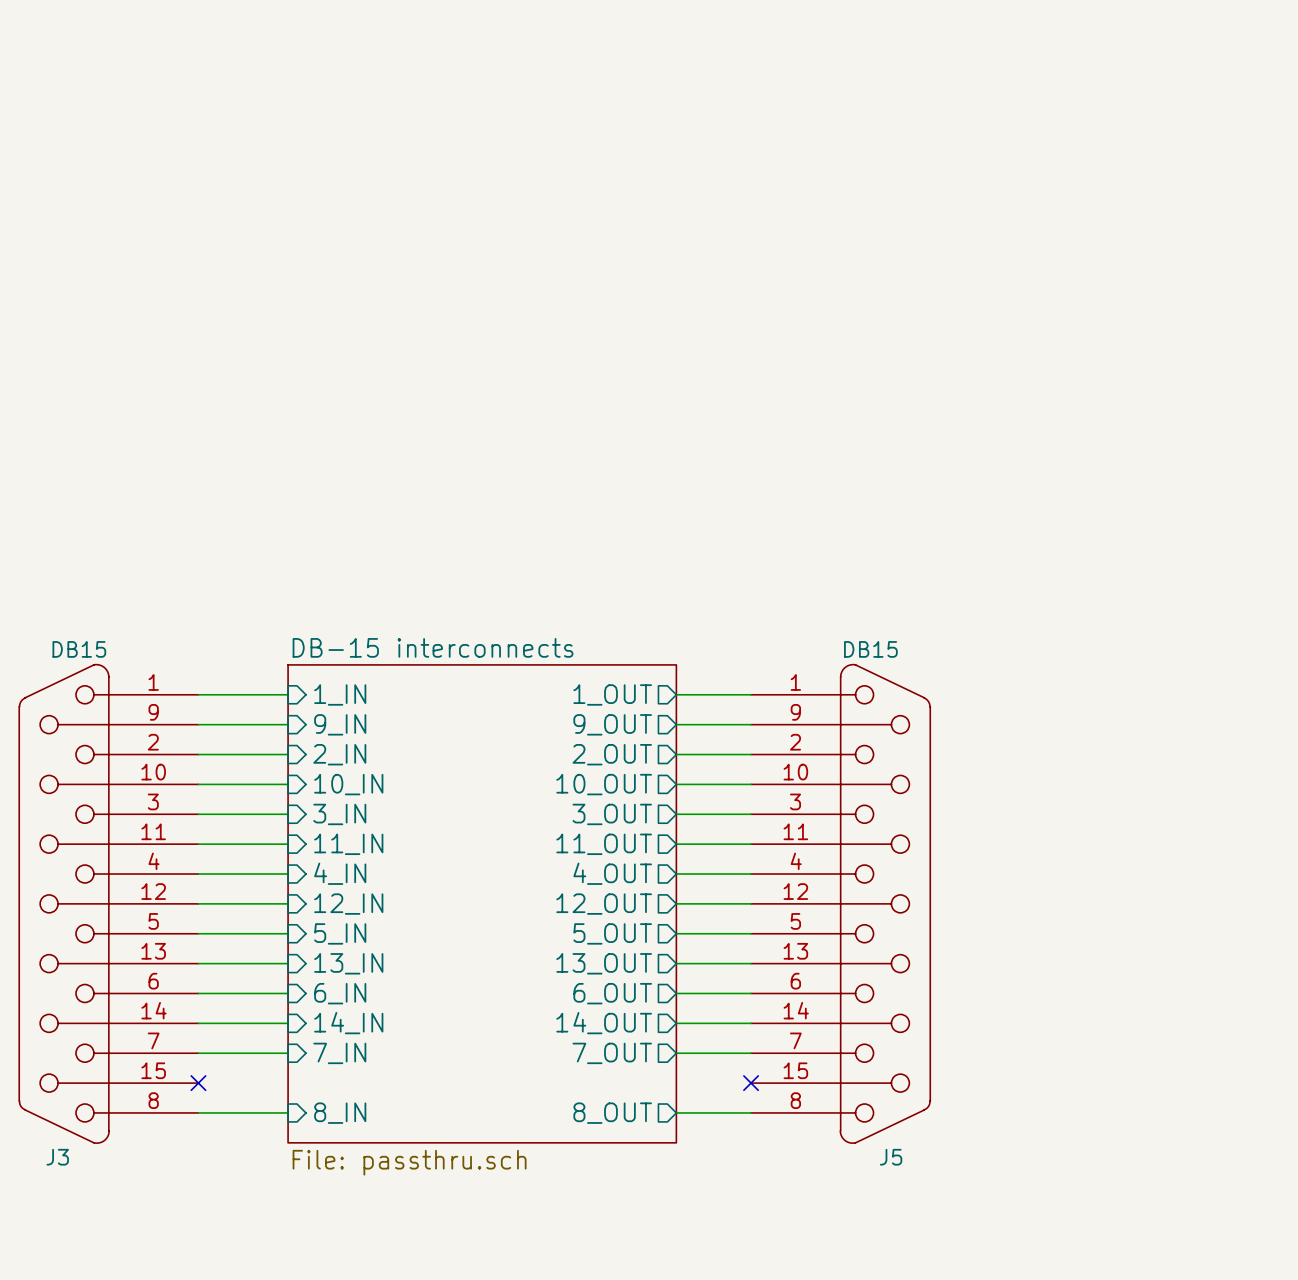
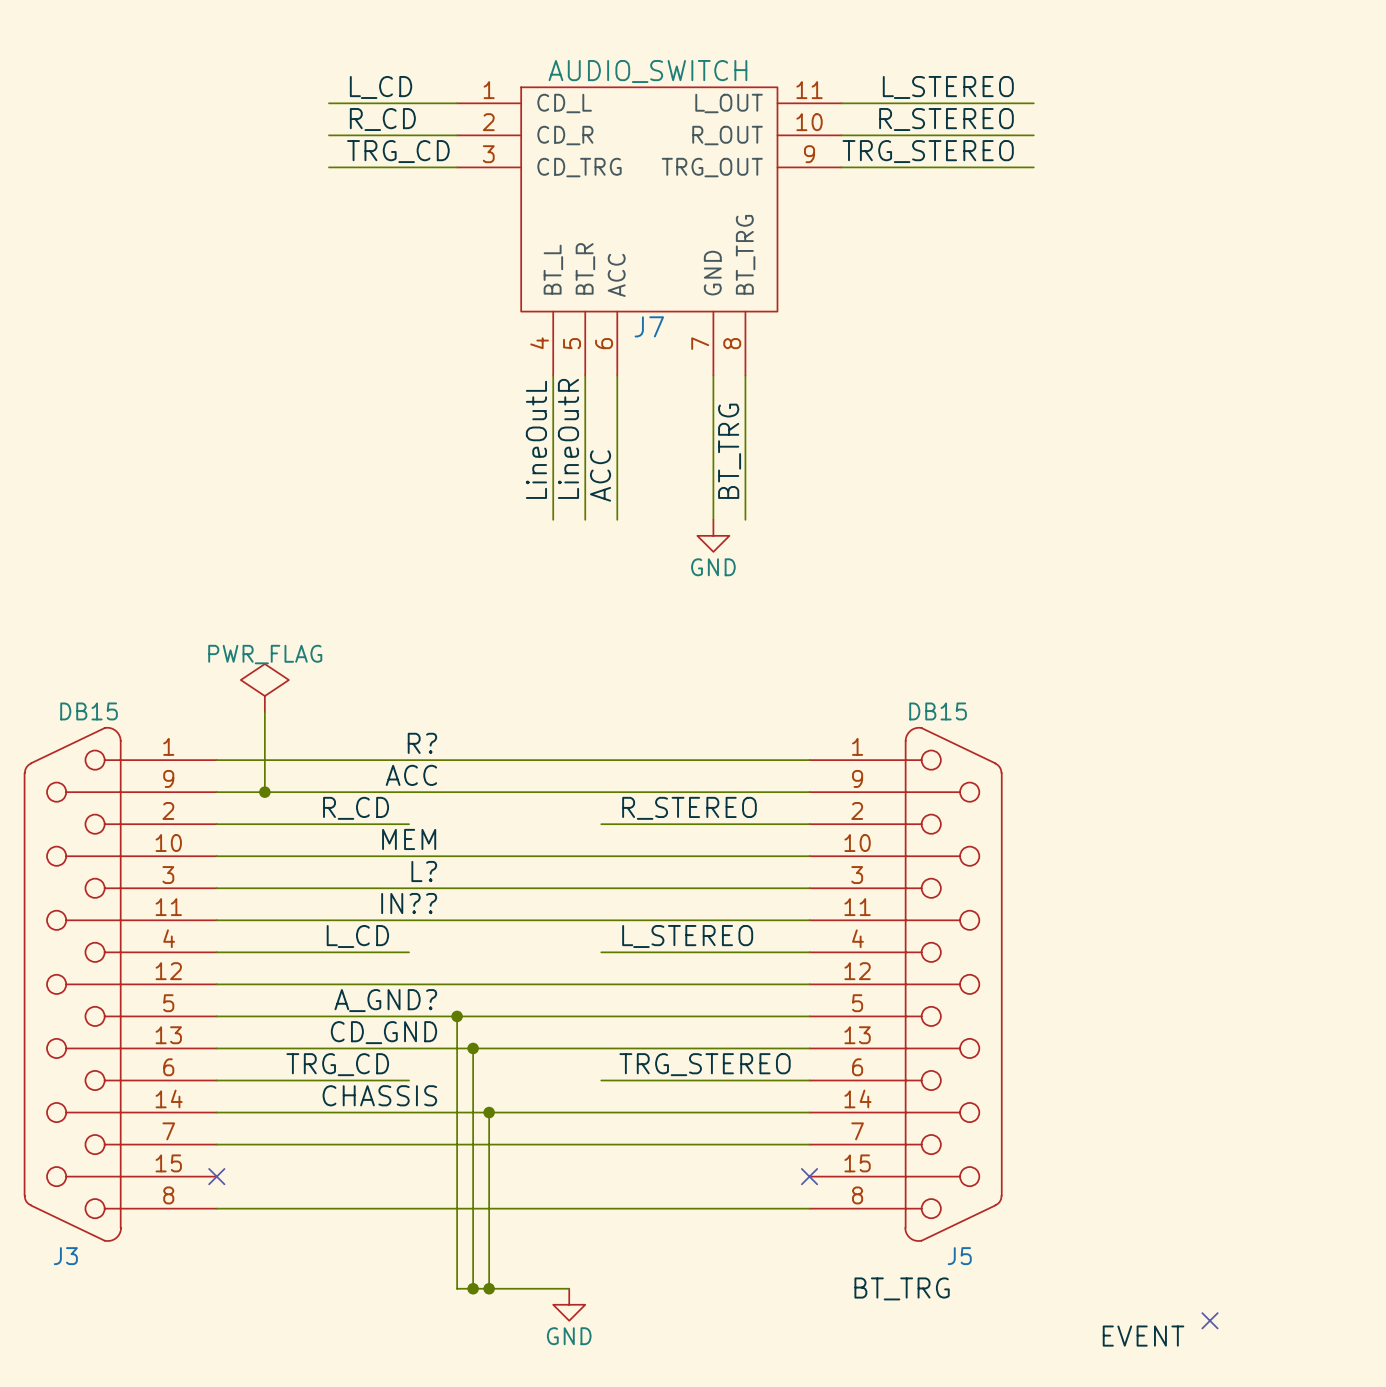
label: none -> L_CD (381, 87)
label: none -> L_STEREO (948, 87)
wire: none -> (328, 103) (457, 103)
wire: none -> (841, 103) (1033, 103)
label: none -> R_CD (382, 119)
label: none -> R_STEREO (946, 119)
wire: none -> (328, 135) (457, 135)
wire: none -> (841, 135) (1033, 135)
label: none -> TRG_CD (398, 151)
label: none -> TRG_STEREO (928, 151)
wire: none -> (328, 167) (457, 167)
wire: none -> (841, 167) (1033, 167)
J7: none -> AUDIO_SWITCH (649, 231)
wire: none -> (553, 375) (553, 519)
wire: none -> (585, 375) (585, 519)
wire: none -> (617, 375) (617, 519)
wire: none -> (713, 375) (713, 519)
wire: none -> (745, 375) (745, 519)
label: none -> LineOutR (568, 438)
label: none -> LineOutL (536, 439)
label: none -> BT_TRG (729, 451)
label: none -> ACC (600, 476)
power symbol: none -> GND (713, 535)
power symbol: none -> PWR_FLAG (264, 688)
wire: none -> (264, 712) (264, 792)
label: none -> R? (422, 743)
wire: none -> (312, 760) (729, 760)
sheet pin: 1_IN (340, 694) -> none
sheet pin: 1_OUT (612, 694) -> none
label: none -> ACC (411, 775)
junction: none -> (264, 792)
wire: none -> (312, 792) (729, 792)
sheet pin: 9_IN (340, 724) -> none
sheet pin: 9_OUT (612, 724) -> none
label: none -> R_CD (356, 808)
label: none -> R_STEREO (689, 808)
wire: none -> (312, 824) (409, 824)
sheet pin: 2_IN (339, 754) -> none
wire: none -> (601, 824) (729, 824)
sheet pin: 2_OUT (612, 754) -> none
label: none -> MEM (409, 839)
wire: none -> (312, 856) (729, 856)
sheet pin: 10_IN (348, 784) -> none
sheet pin: 10_OUT (604, 784) -> none
label: none -> L? (424, 871)
wire: none -> (312, 888) (729, 888)
sheet pin: 3_IN (339, 814) -> none
sheet pin: 3_OUT (612, 814) -> none
label: none -> IN?? (409, 903)
wire: none -> (312, 920) (729, 920)
sheet pin: 11_IN (348, 844) -> none
sheet pin: 11_OUT (604, 844) -> none
label: none -> L_CD (357, 936)
label: none -> L_STEREO (687, 936)
sheet pin: 4_IN (340, 873) -> none
sheet pin: 4_OUT (612, 873) -> none
wire: none -> (312, 952) (409, 952)
wire: none -> (601, 952) (729, 952)
wire: none -> (312, 984) (729, 984)
sheet DB-15 interconnects: File: passthru.sch (482, 903) -> none
sheet pin: 12_IN (348, 904) -> none
sheet pin: 12_OUT (604, 904) -> none
label: none -> A_GND? (385, 1000)
wire: none -> (312, 1016) (729, 1016)
sheet pin: 5_IN (340, 933) -> none
wire: none -> (457, 1016) (457, 1288) (569, 1288)
junction: none -> (457, 1016)
sheet pin: 5_OUT (612, 933) -> none
label: none -> CD_GND (383, 1032)
wire: none -> (312, 1048) (729, 1048)
sheet pin: 13_IN (348, 963) -> none
wire: none -> (473, 1048) (473, 1288)
junction: none -> (473, 1048)
sheet pin: 13_OUT (604, 963) -> none
label: none -> TRG_CD (337, 1064)
label: none -> TRG_STEREO (705, 1064)
wire: none -> (312, 1080) (409, 1080)
sheet pin: 6_IN (340, 993) -> none
wire: none -> (601, 1080) (729, 1080)
sheet pin: 6_OUT (612, 993) -> none
label: none -> CHASSIS (379, 1095)
wire: none -> (312, 1112) (729, 1112)
sheet pin: 14_IN (348, 1023) -> none
wire: none -> (489, 1112) (489, 1288)
junction: none -> (489, 1112)
sheet pin: 14_OUT (604, 1023) -> none
wire: none -> (312, 1144) (729, 1144)
sheet pin: 7_IN (339, 1053) -> none
sheet pin: 7_OUT (612, 1053) -> none
wire: none -> (312, 1208) (729, 1208)
sheet pin: 8_IN (340, 1113) -> none
sheet pin: 8_OUT (612, 1113) -> none
junction: none -> (473, 1288)
junction: none -> (489, 1288)
label: none -> BT_TRG (902, 1288)
power symbol: none -> GND (569, 1304)
no-connect mark: none -> (1210, 1320)
label: none -> EVENT (1143, 1336)

